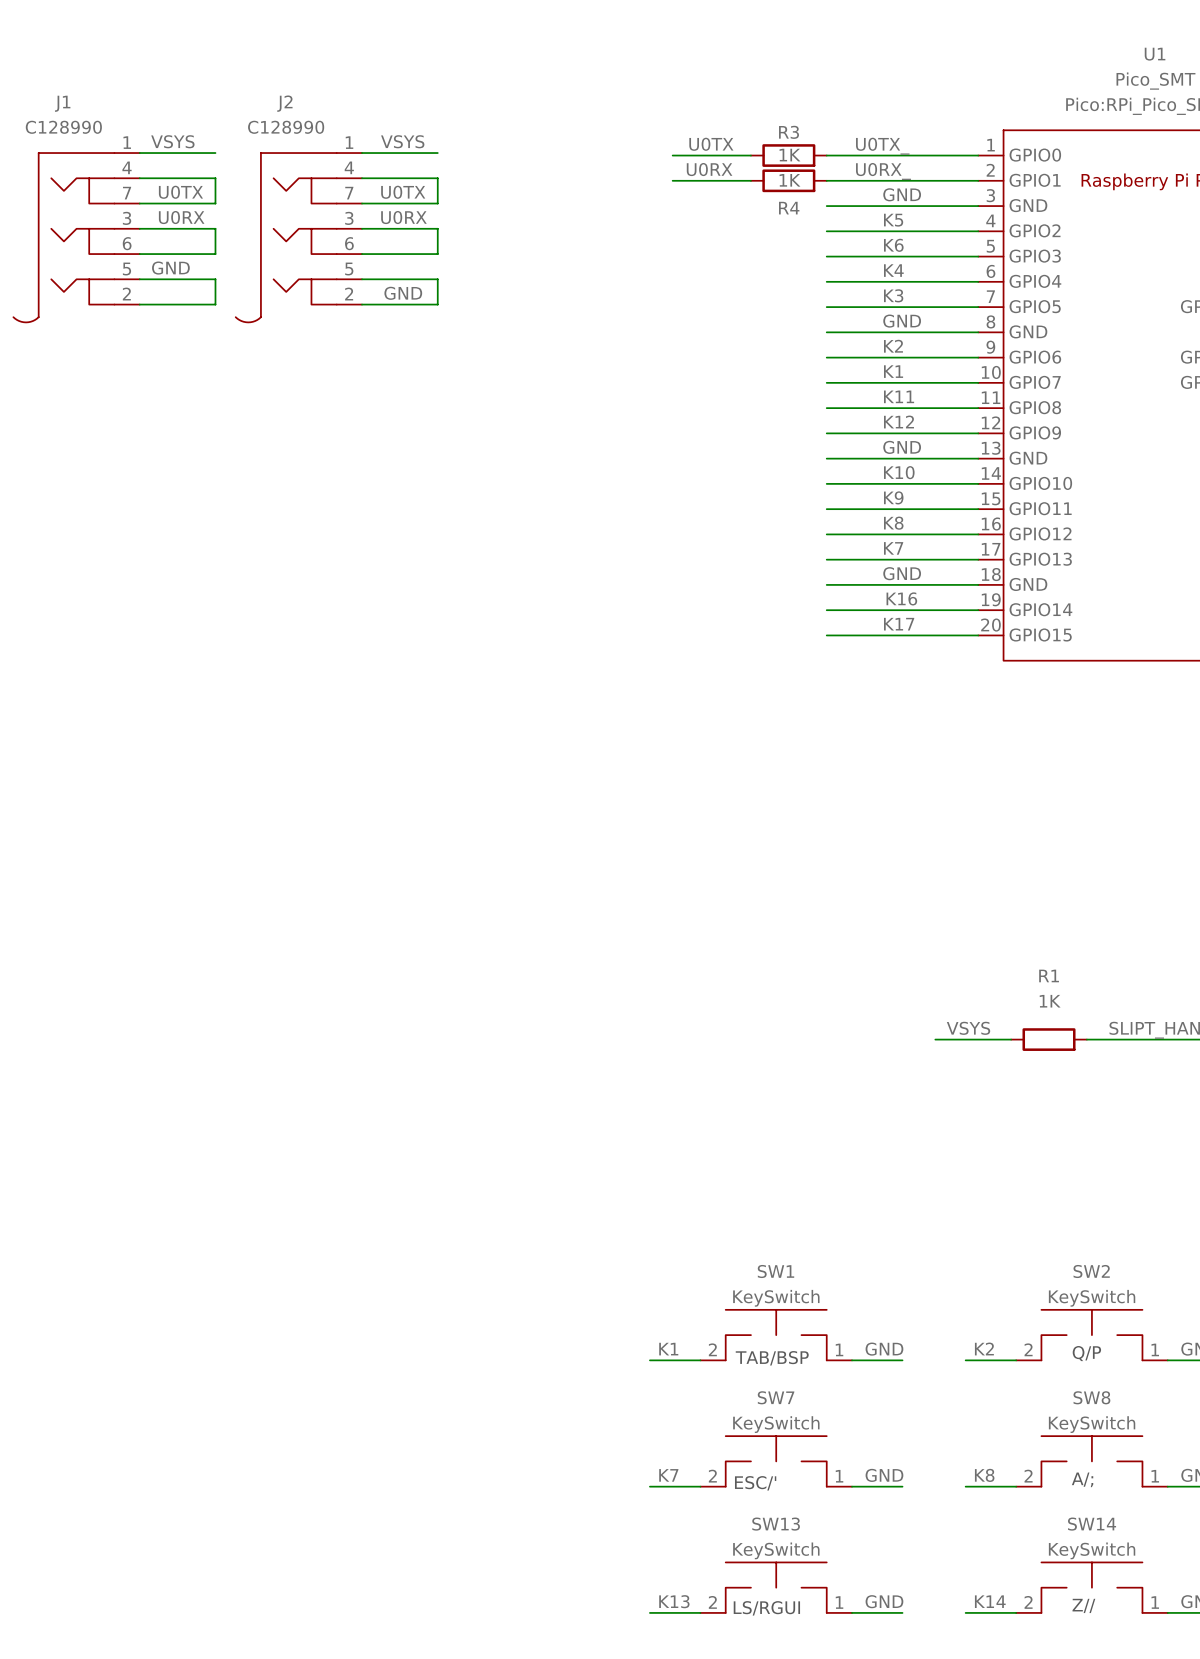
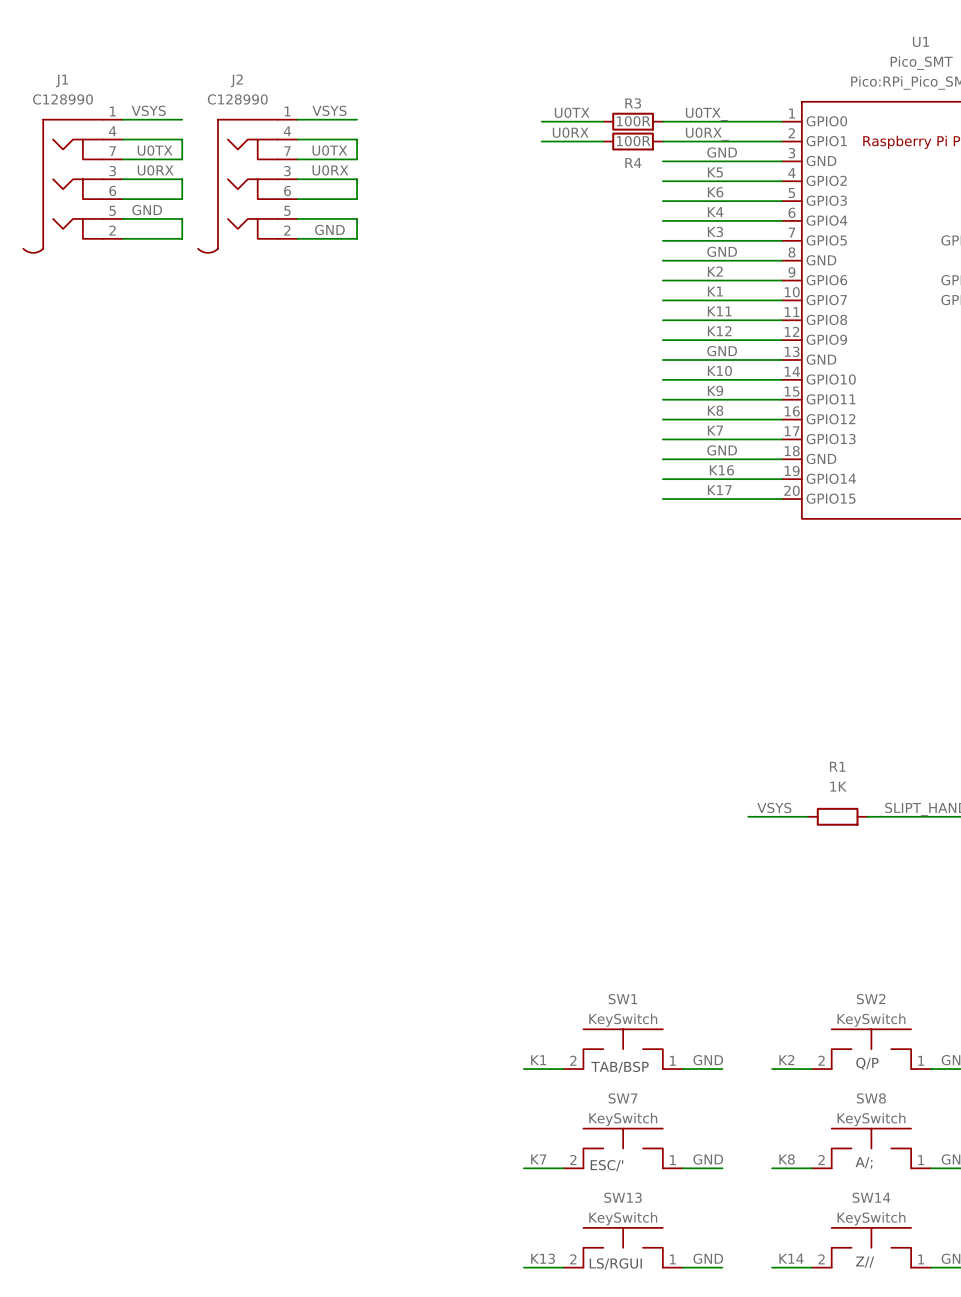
R3 value: 1K (789, 155) -> 100R (633, 121)
R4 value: 1K (789, 180) -> 100R (633, 141)

